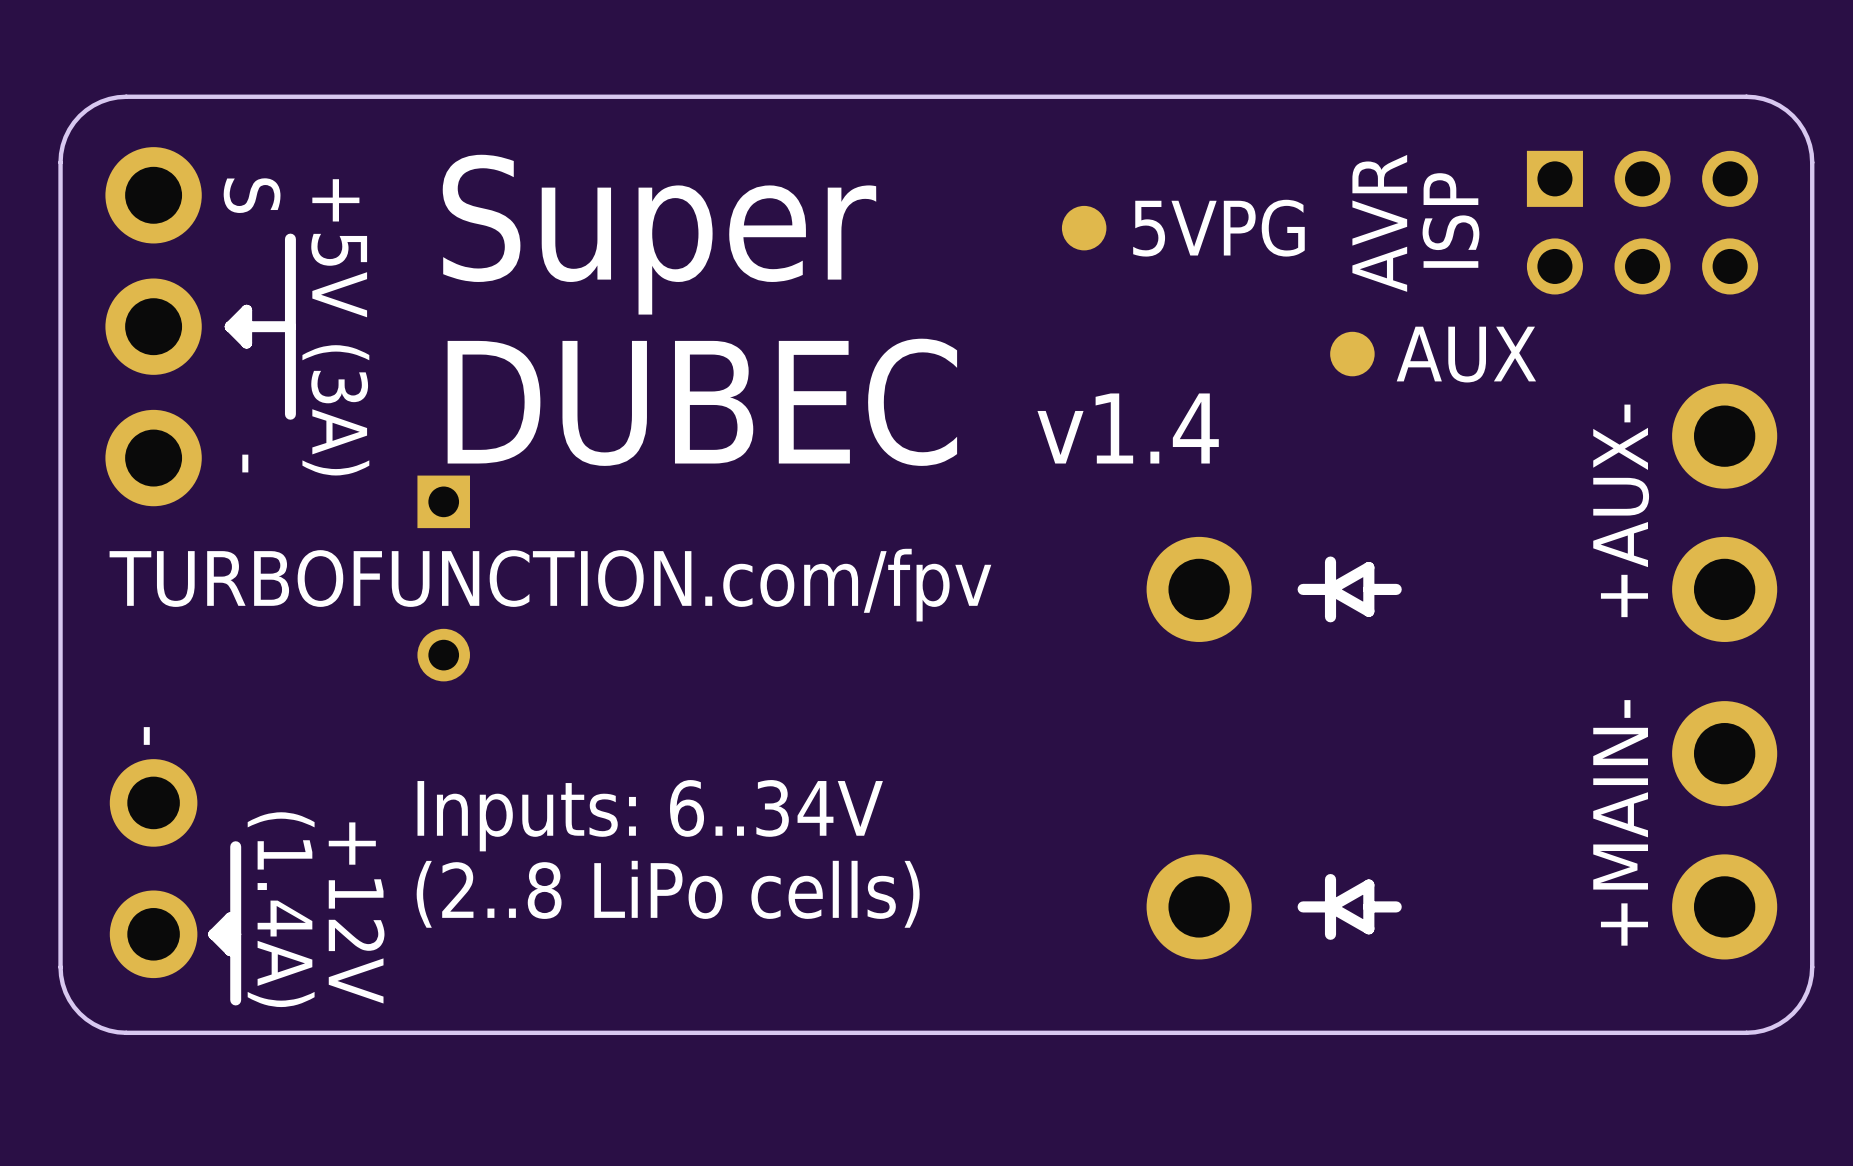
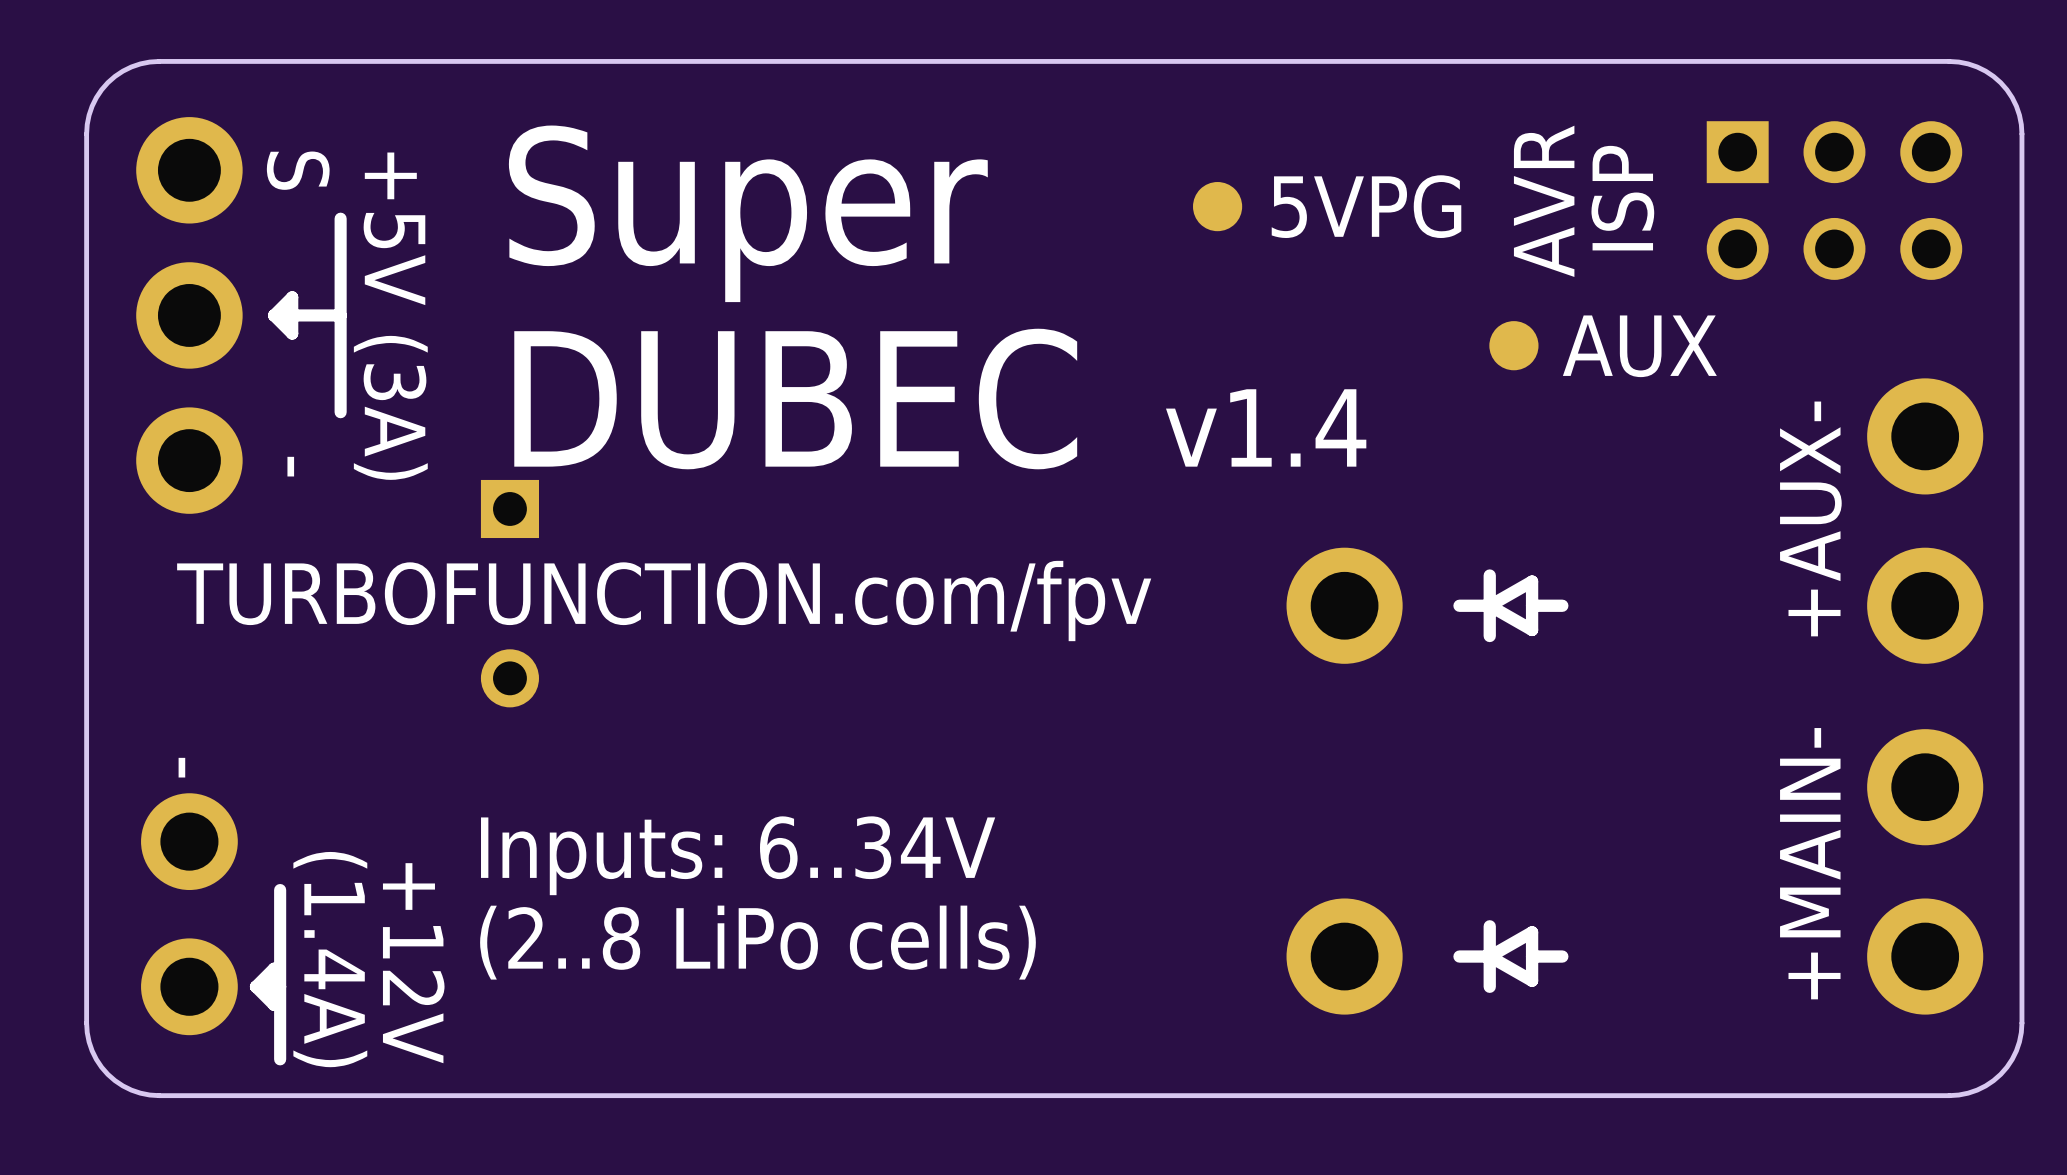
text position: TURBOFUNCTION.com/fpv (550, 585) -> TURBOFUNCTION.com/fpv (664, 601)

